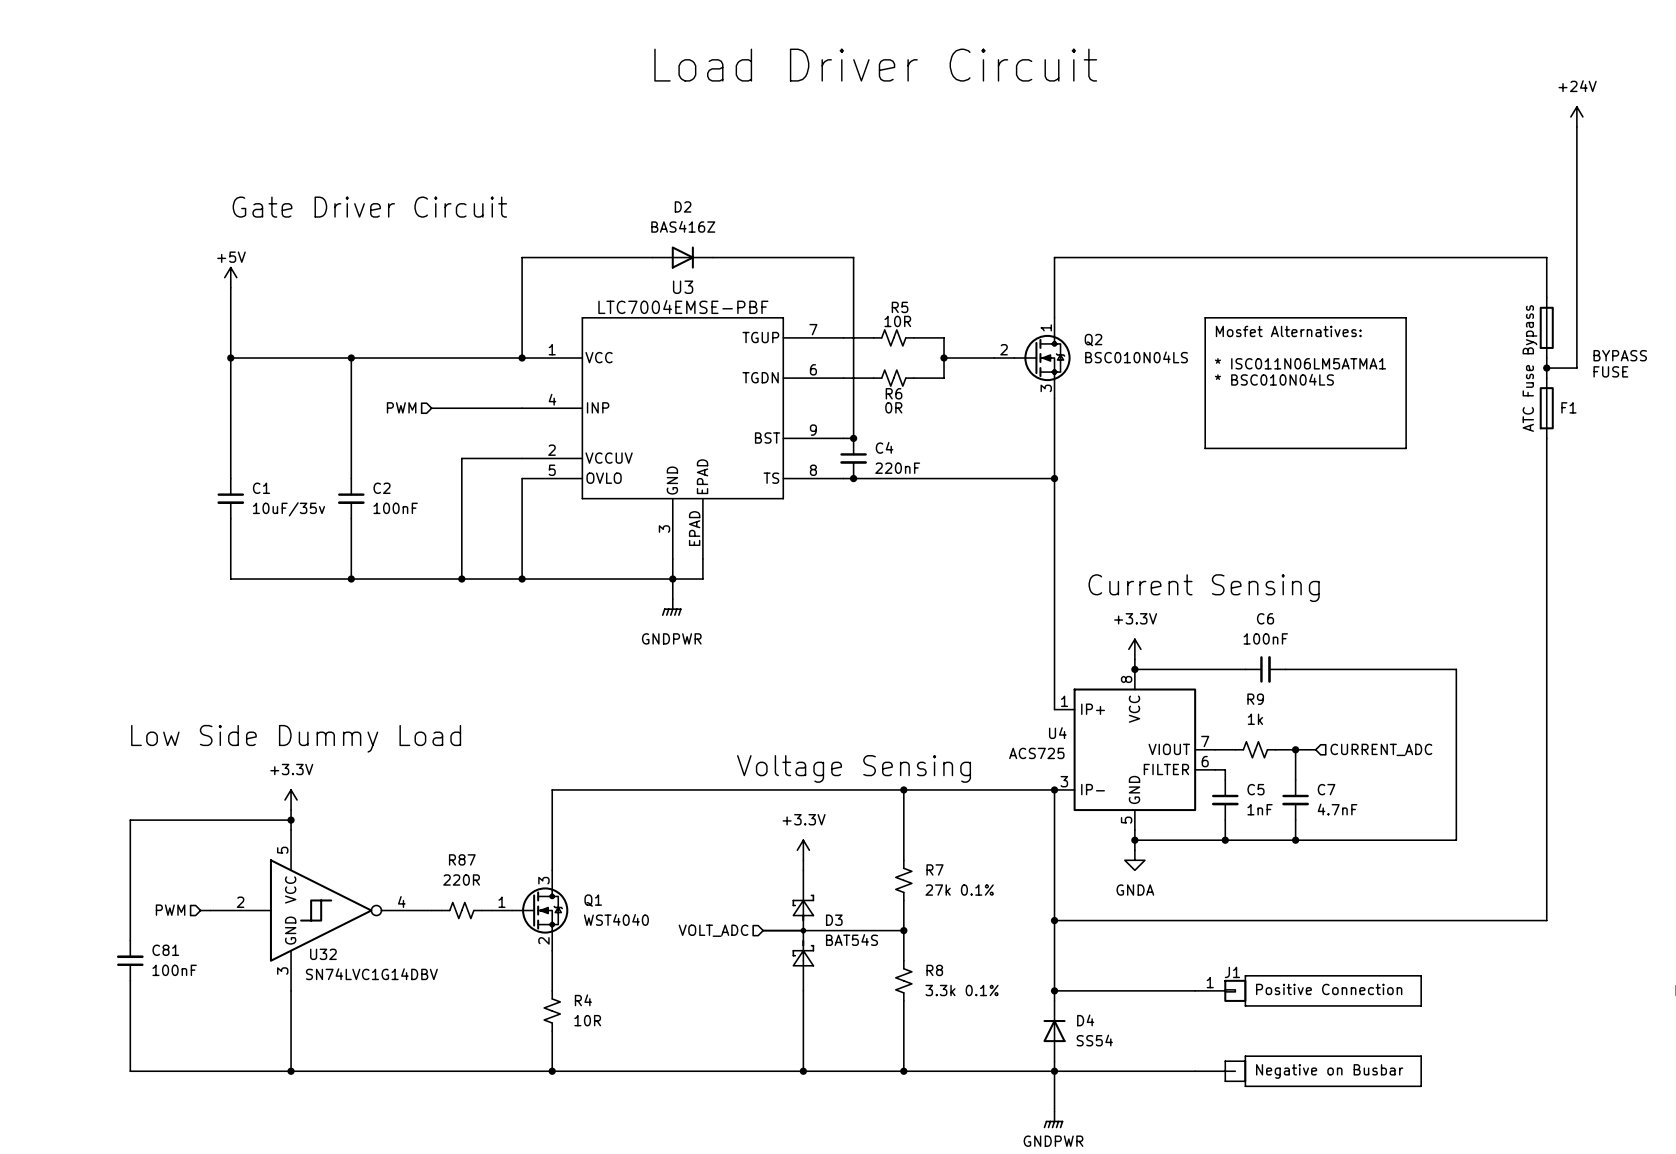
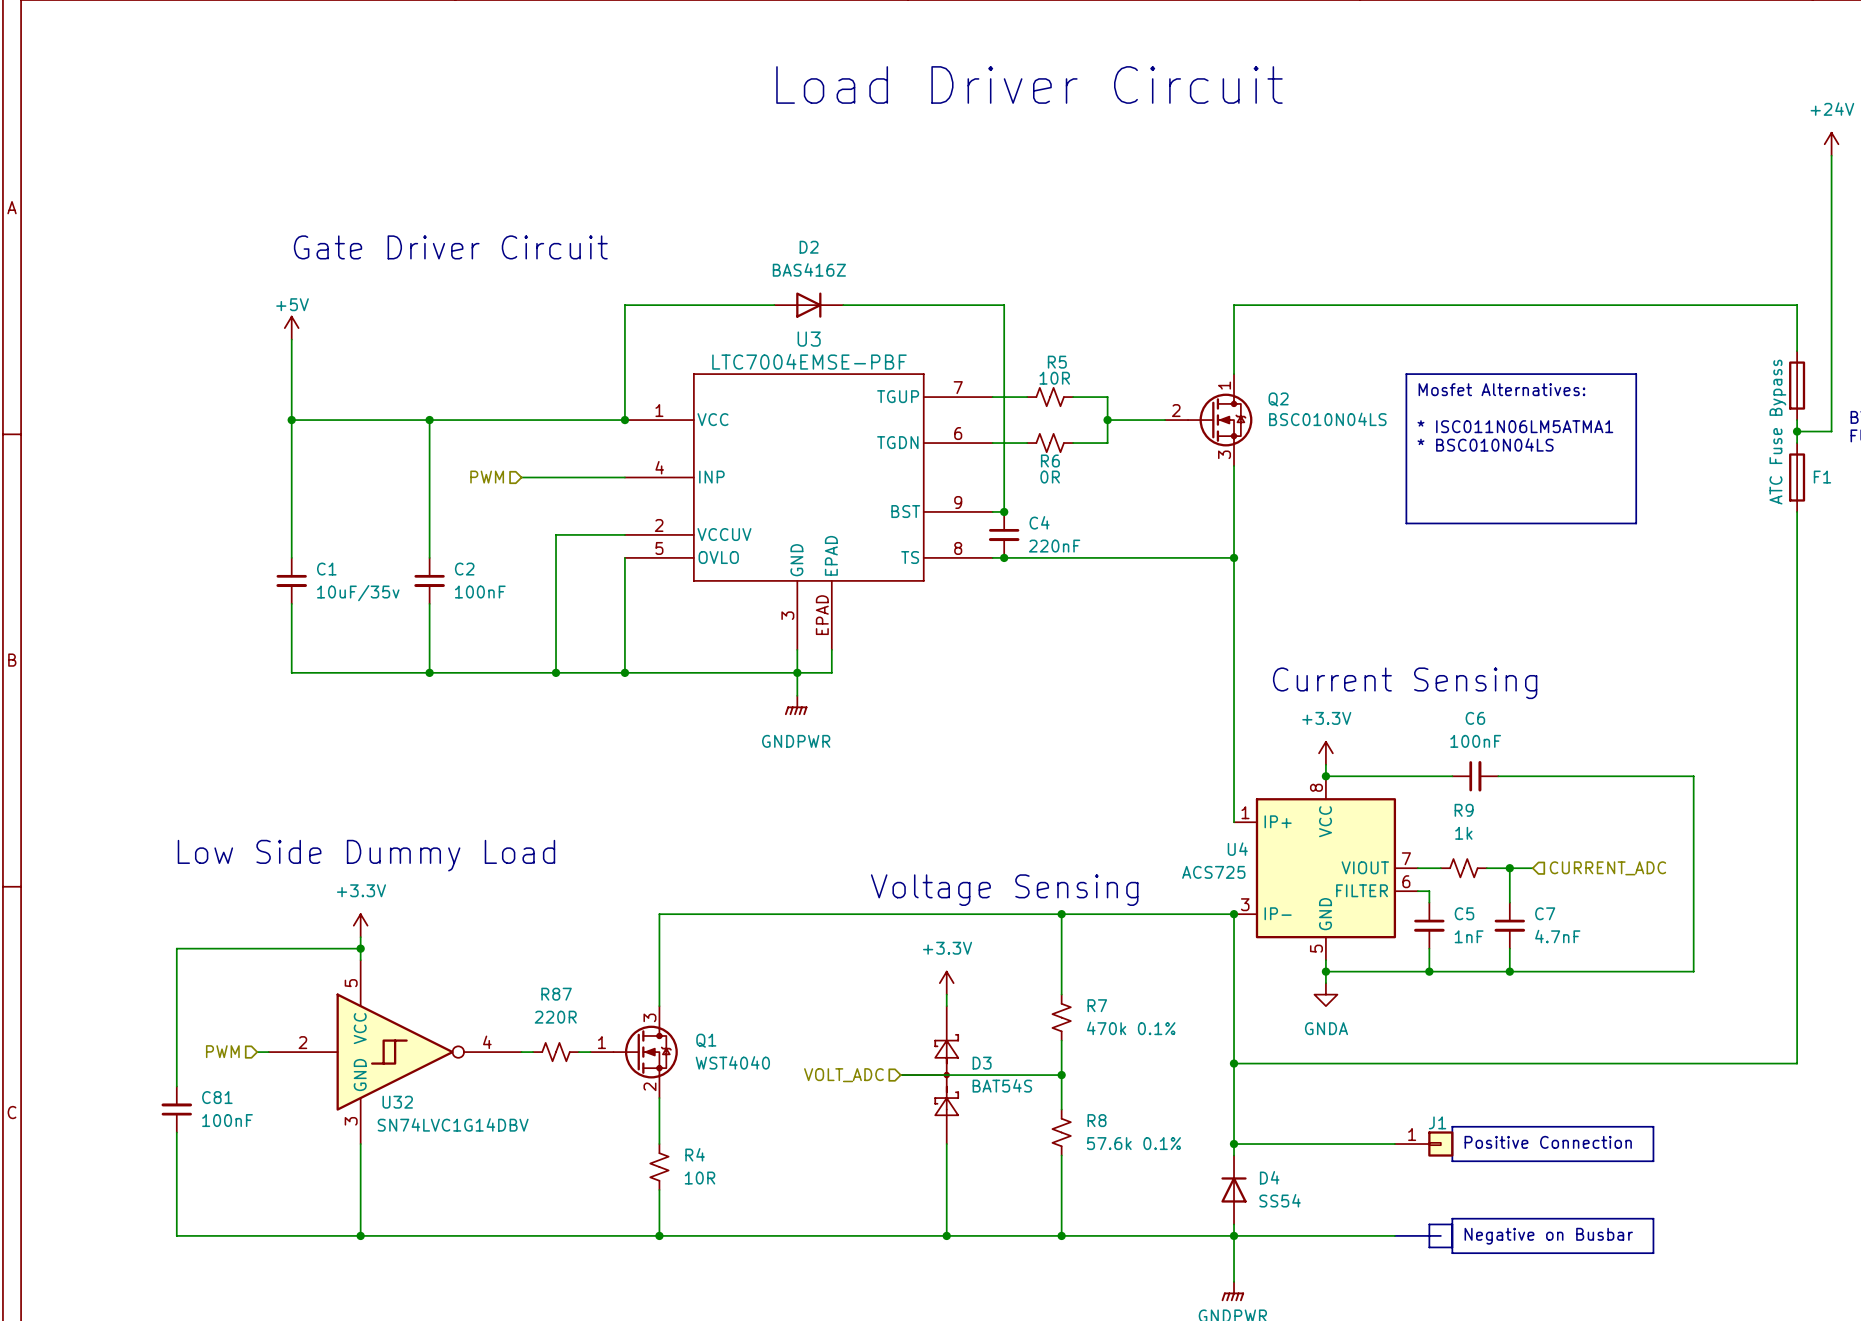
R7 value: 27k 0.1% (959, 890) -> 470k 0.1% (1131, 1028)
R8 value: 3.3k 0.1% (962, 990) -> 57.6k 0.1% (1133, 1143)

